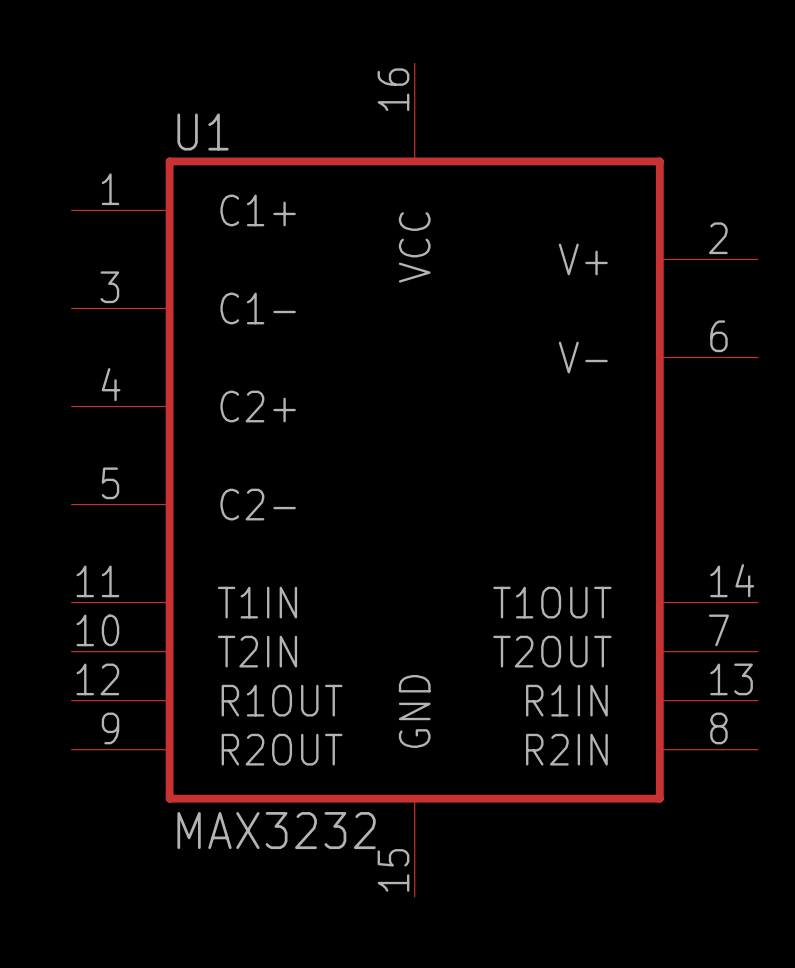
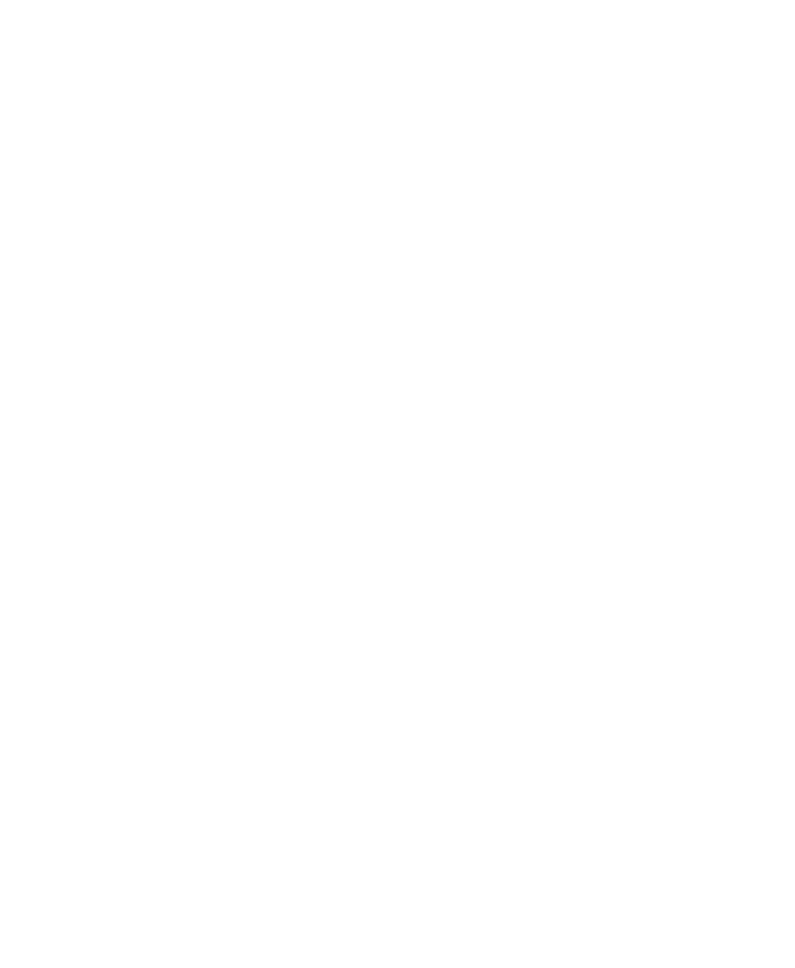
U1: MAX3232 (414, 480) -> none

